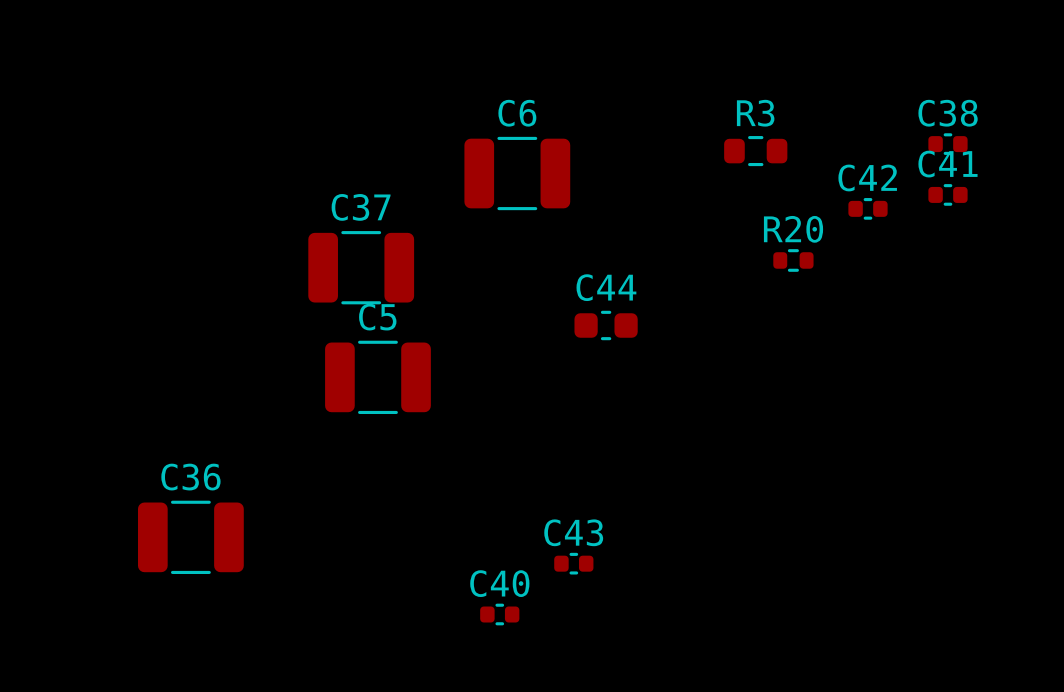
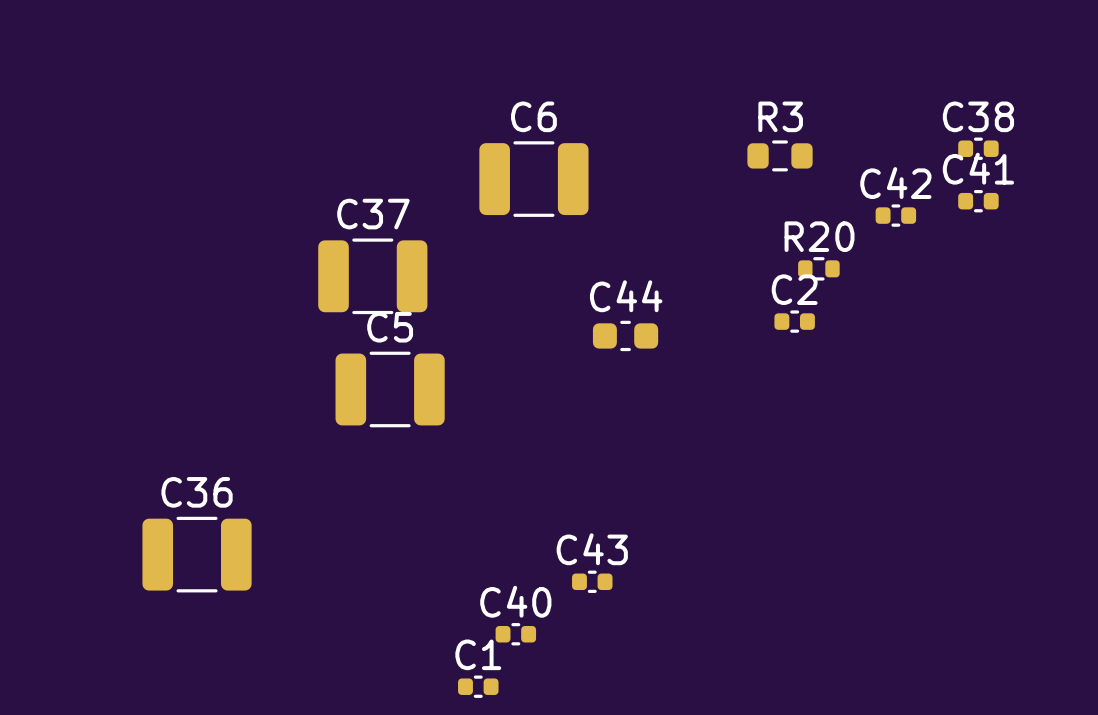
C2: none -> (794, 321)
C1: none -> (478, 686)

